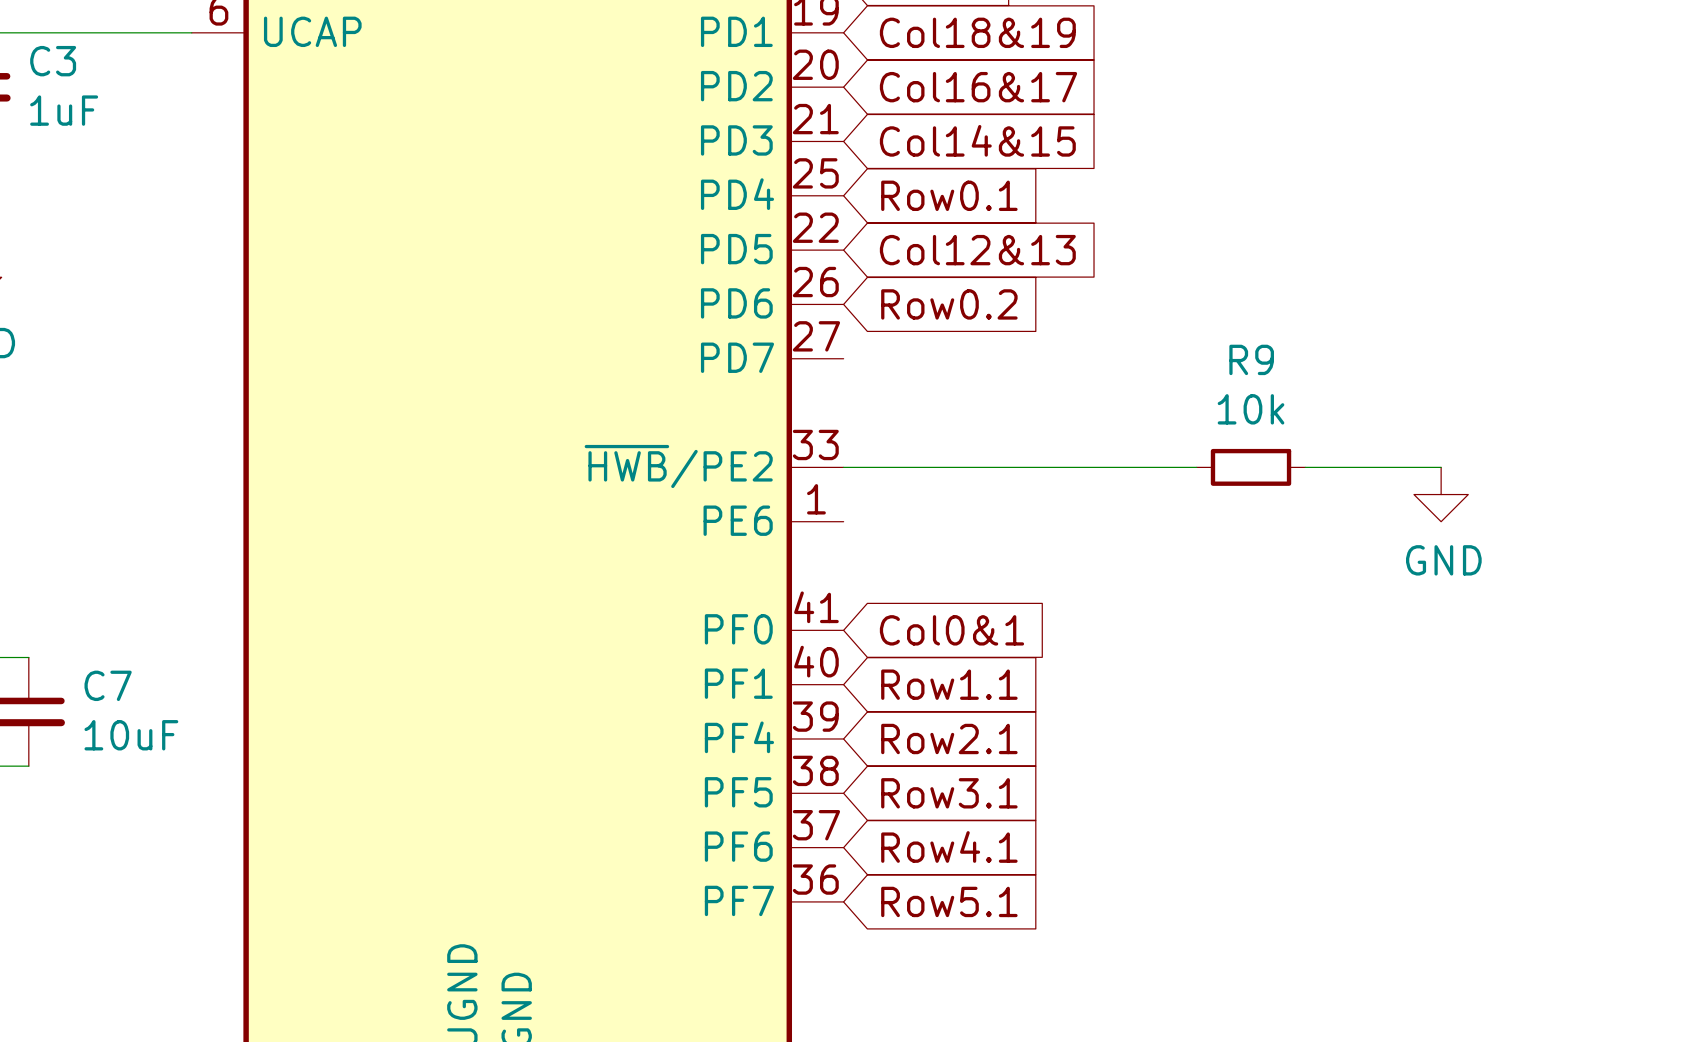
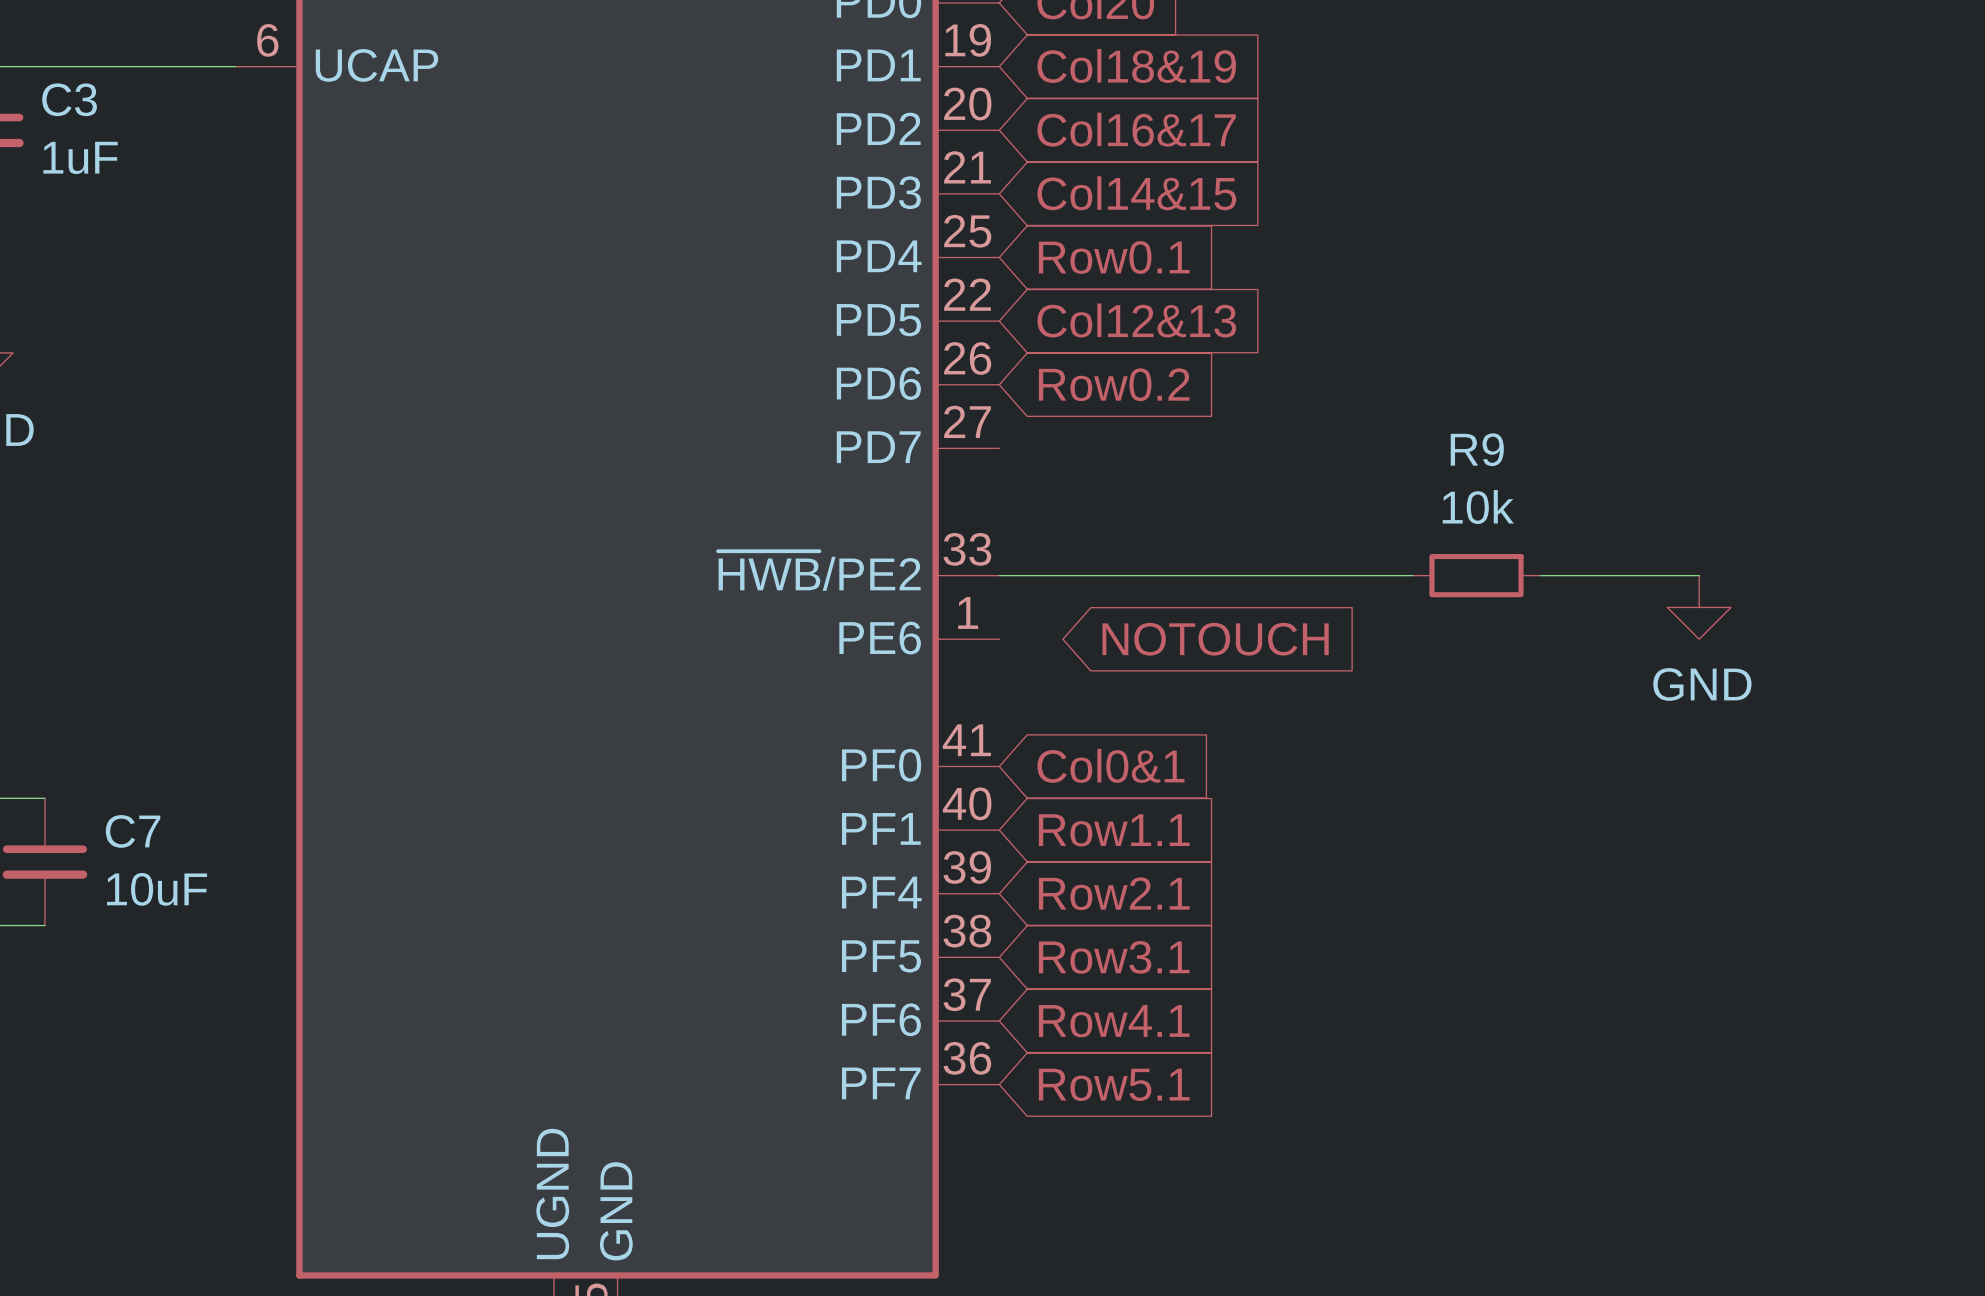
global label: none -> NOTOUCH (1215, 639)

